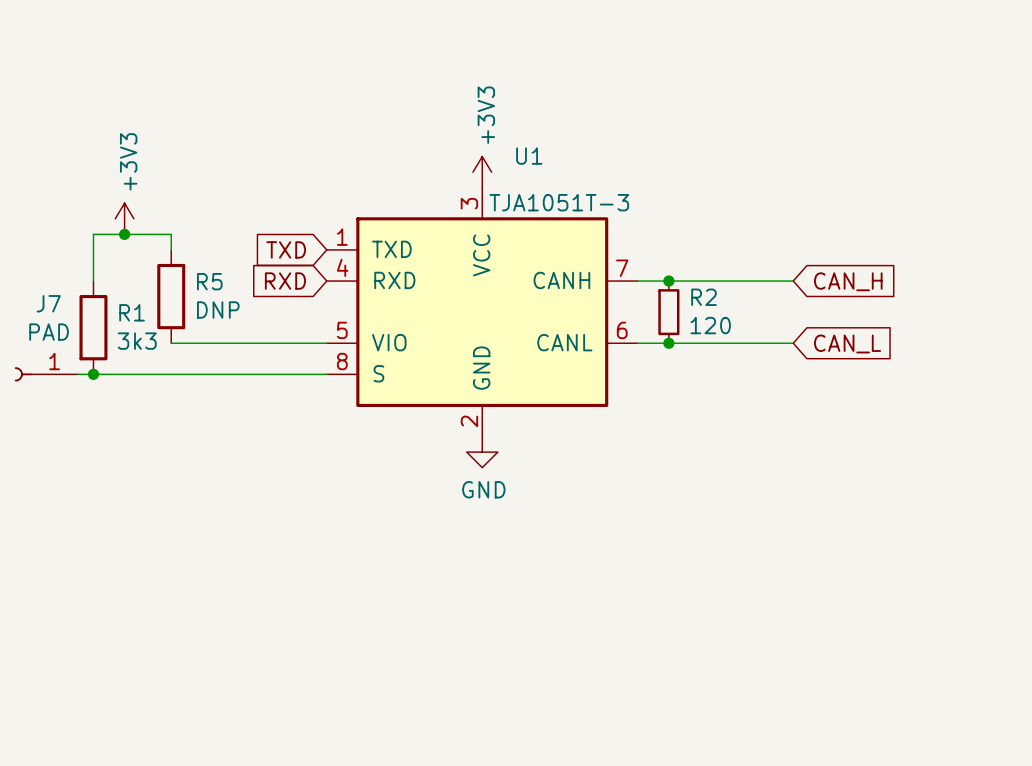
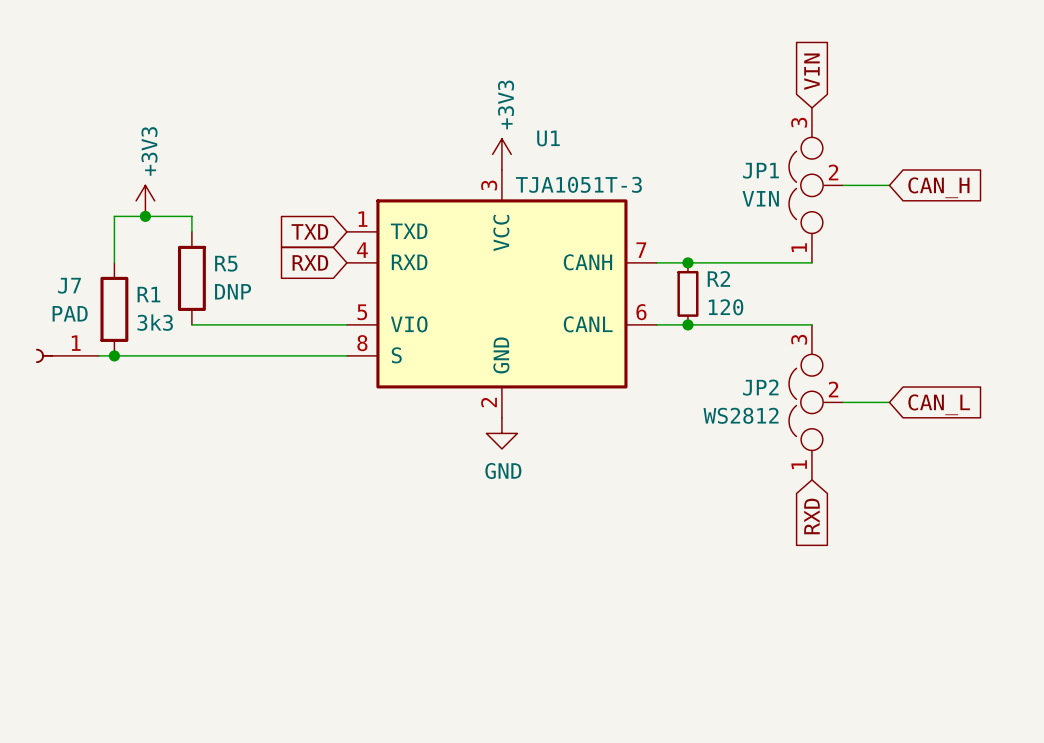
global label: none -> VIN (811, 71)
JP1: none -> VIN (816, 185)
wire: none -> (842, 185) (889, 185)
global label position: CAN_H (848, 281) -> CAN_H (938, 187)
global label position: CAN_L (847, 343) -> CAN_L (939, 404)
JP2: none -> WS2812 (816, 402)
wire: none -> (842, 402) (889, 402)
global label: none -> RXD (811, 516)

